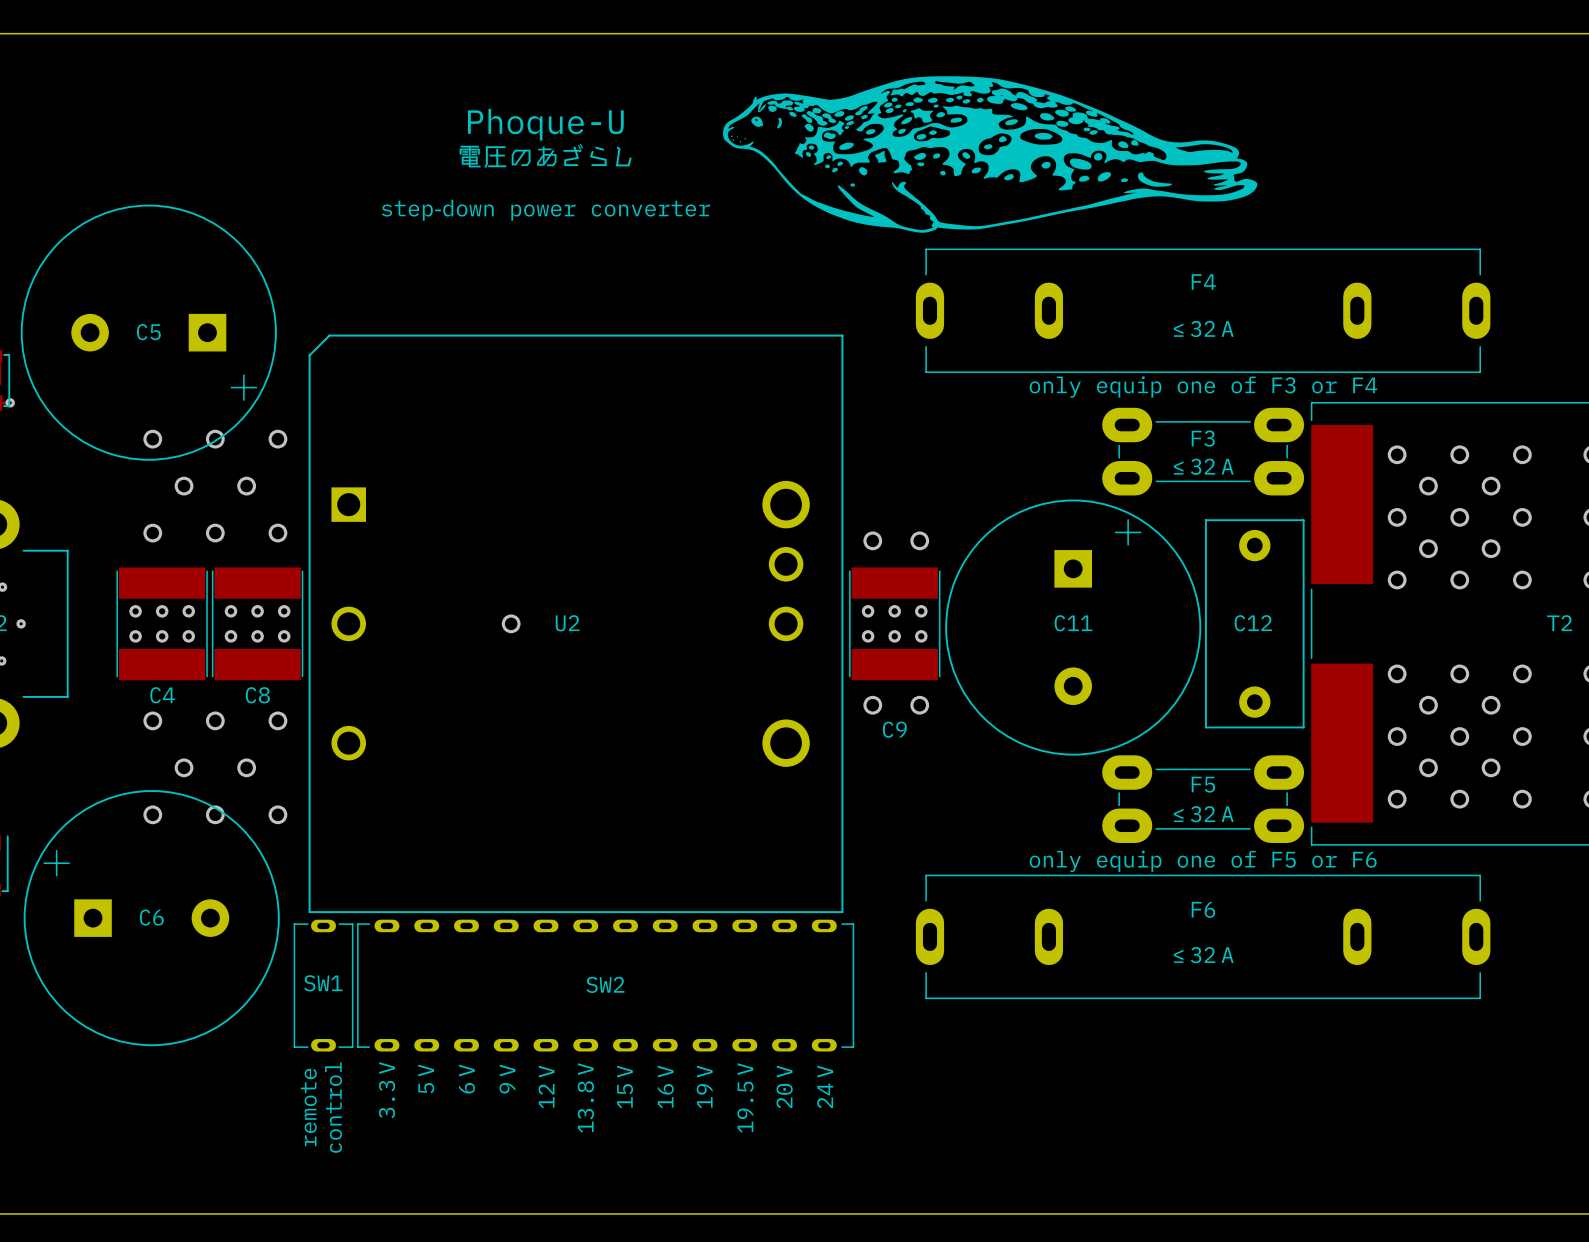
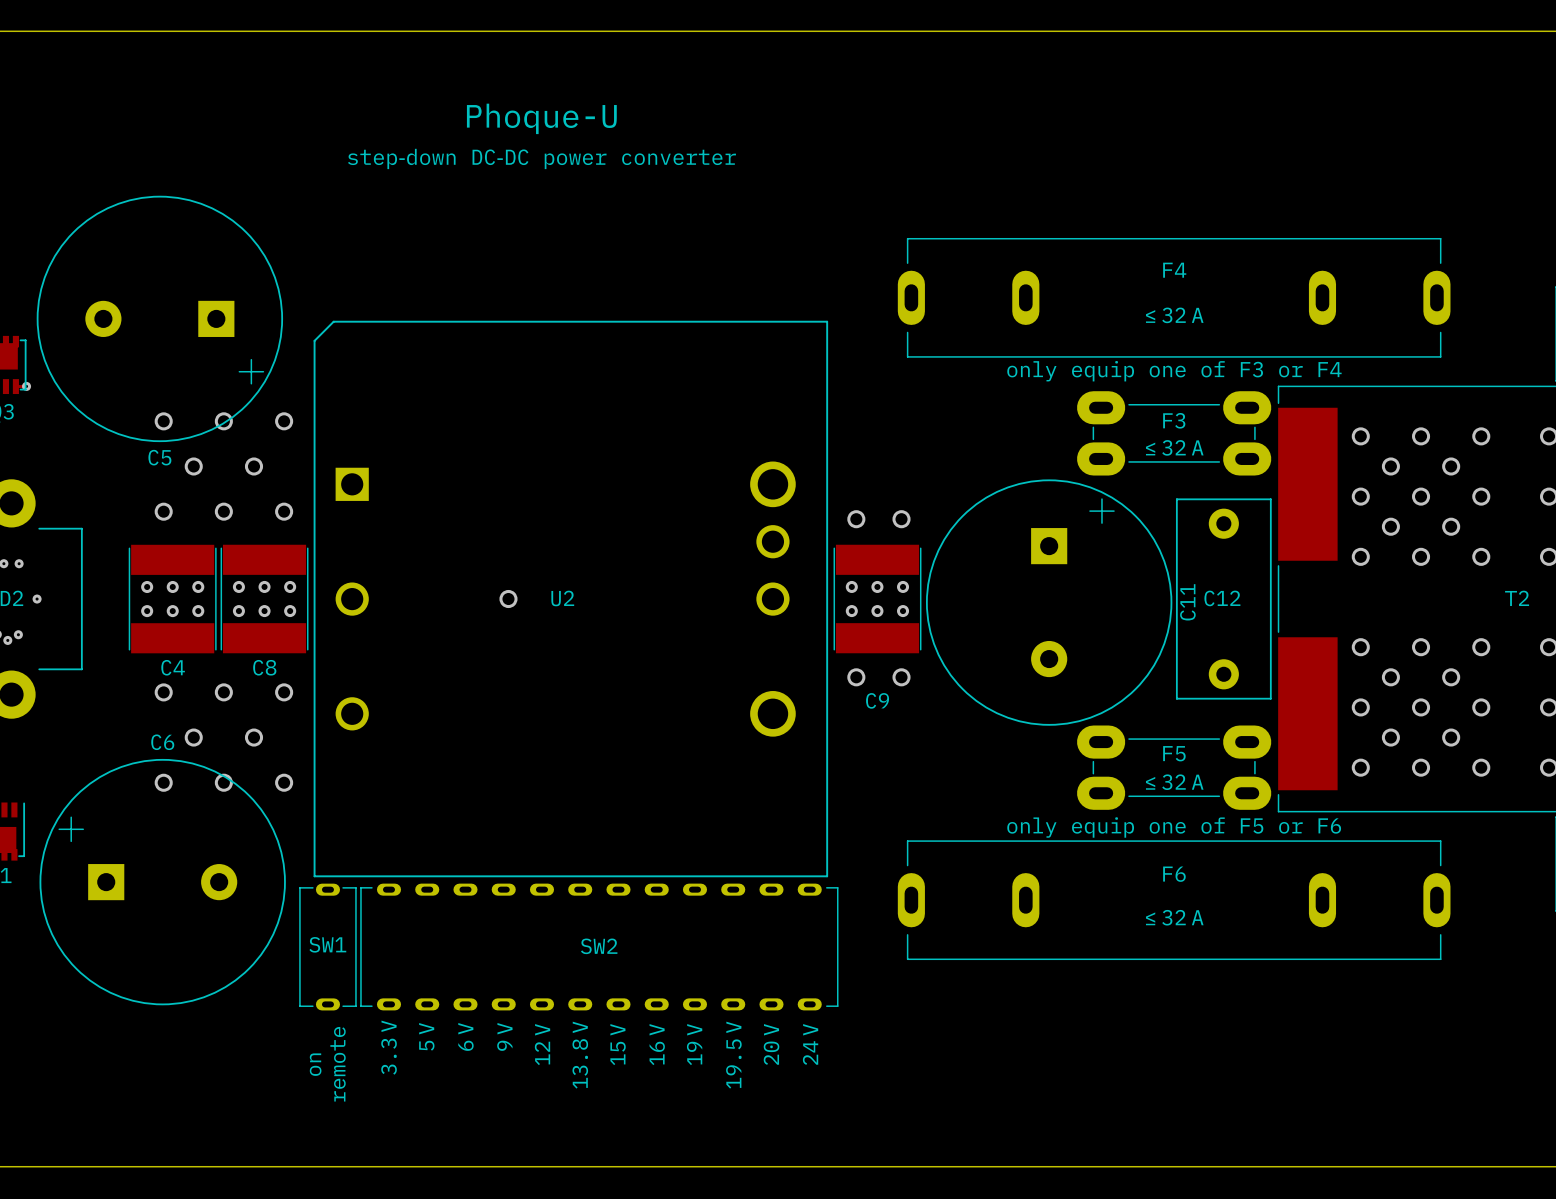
drawing: [723, 76, 1258, 233] -> none
drawing: [459, 144, 632, 168] -> none
text: none -> step‐down DC‐DC power converter (541, 158)
text: step‐down power converter (545, 210) -> none
C5 name position: C5 (148, 332) -> C5 (159, 457)
C11 name rotation: 0° (1073, 623) -> 90° counterclockwise (1187, 602)
C11 name position: C11 (1073, 623) -> C11 (1187, 602)
C6 name position: C6 (151, 917) -> C6 (162, 742)
text: remote (308, 1107) -> on (315, 1064)
text: control (333, 1107) -> remote (338, 1064)

